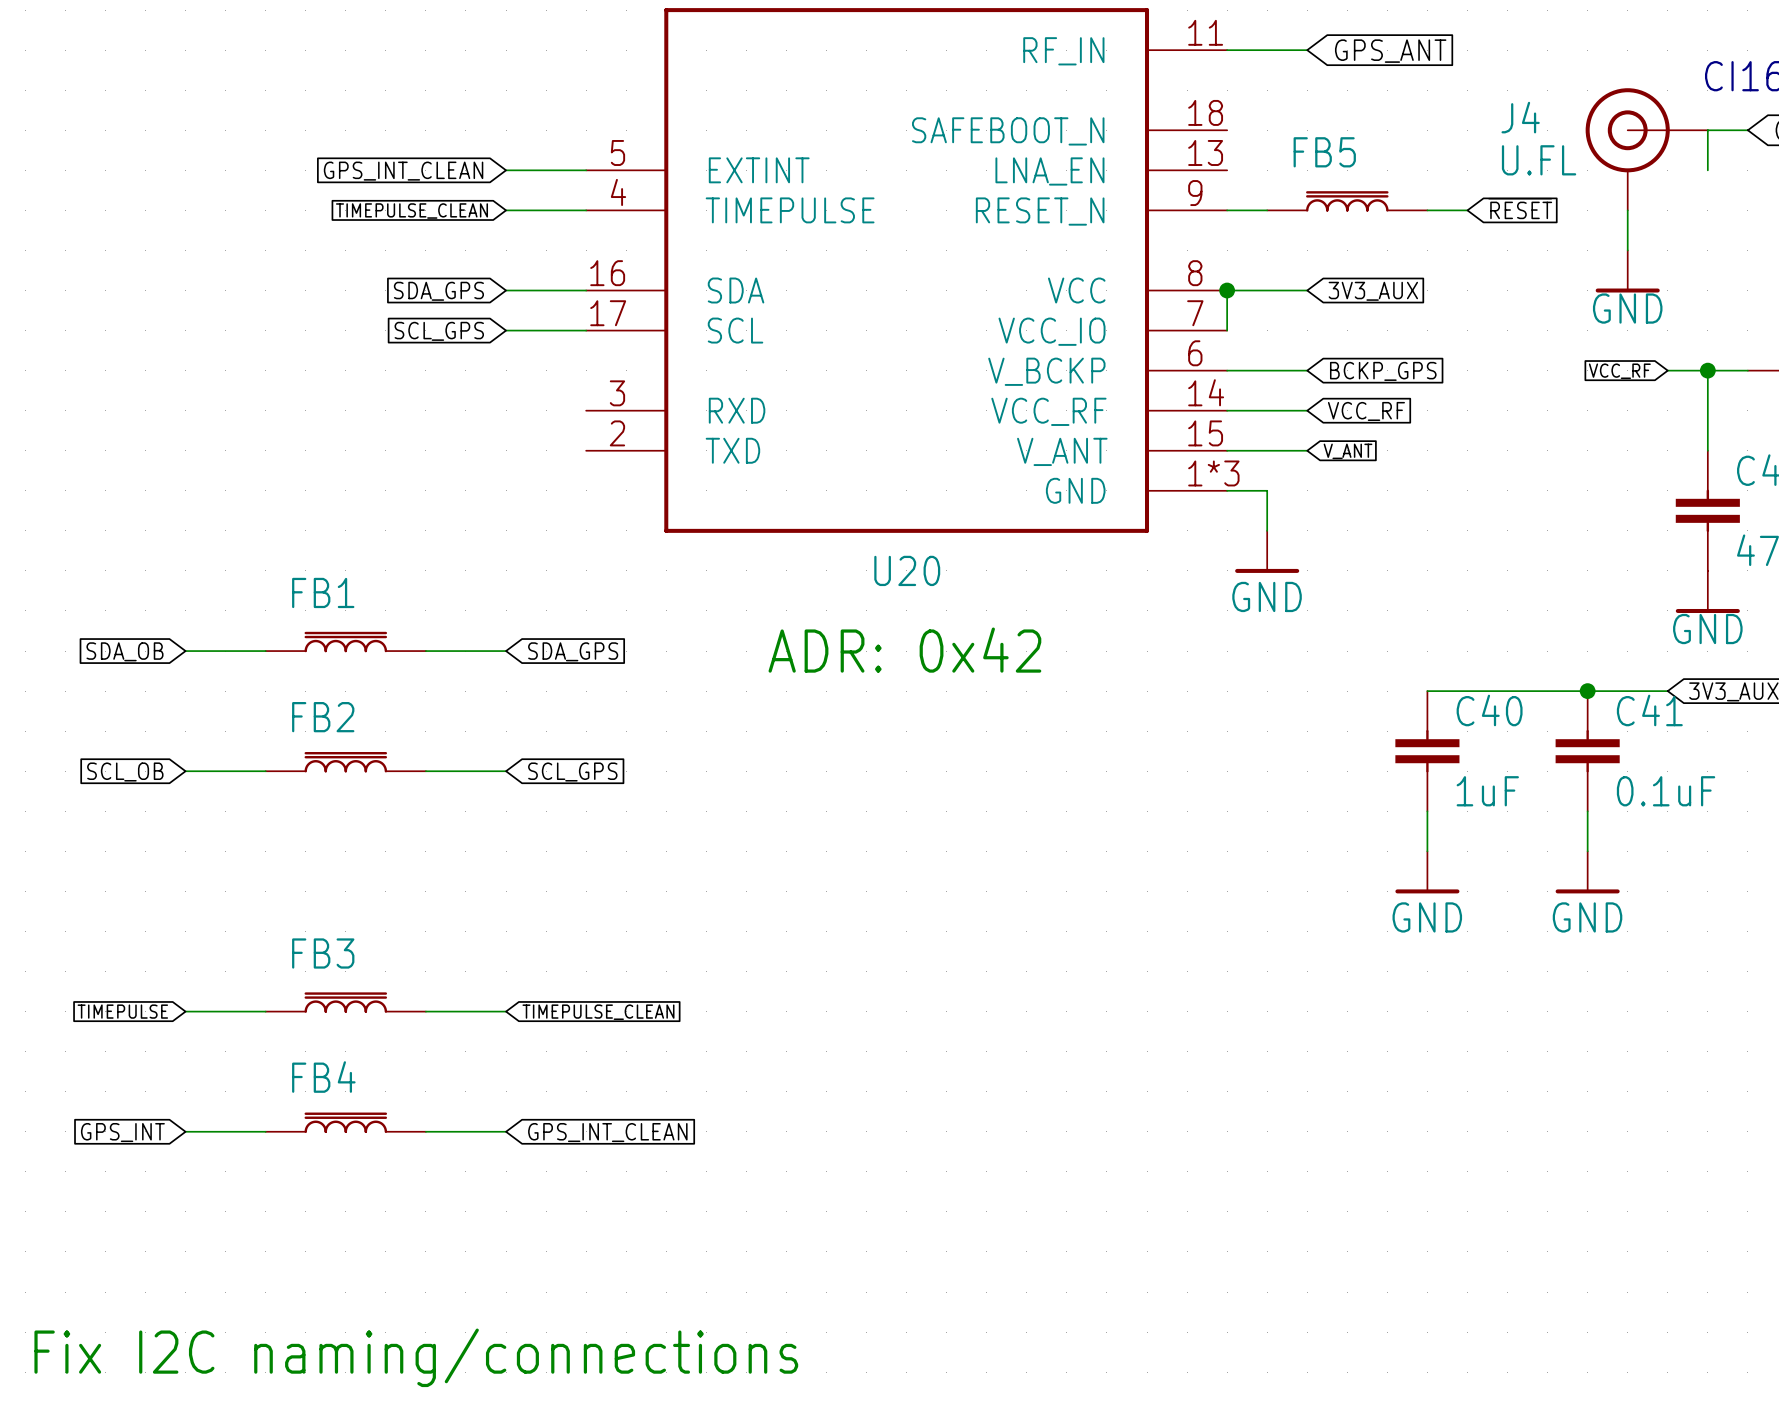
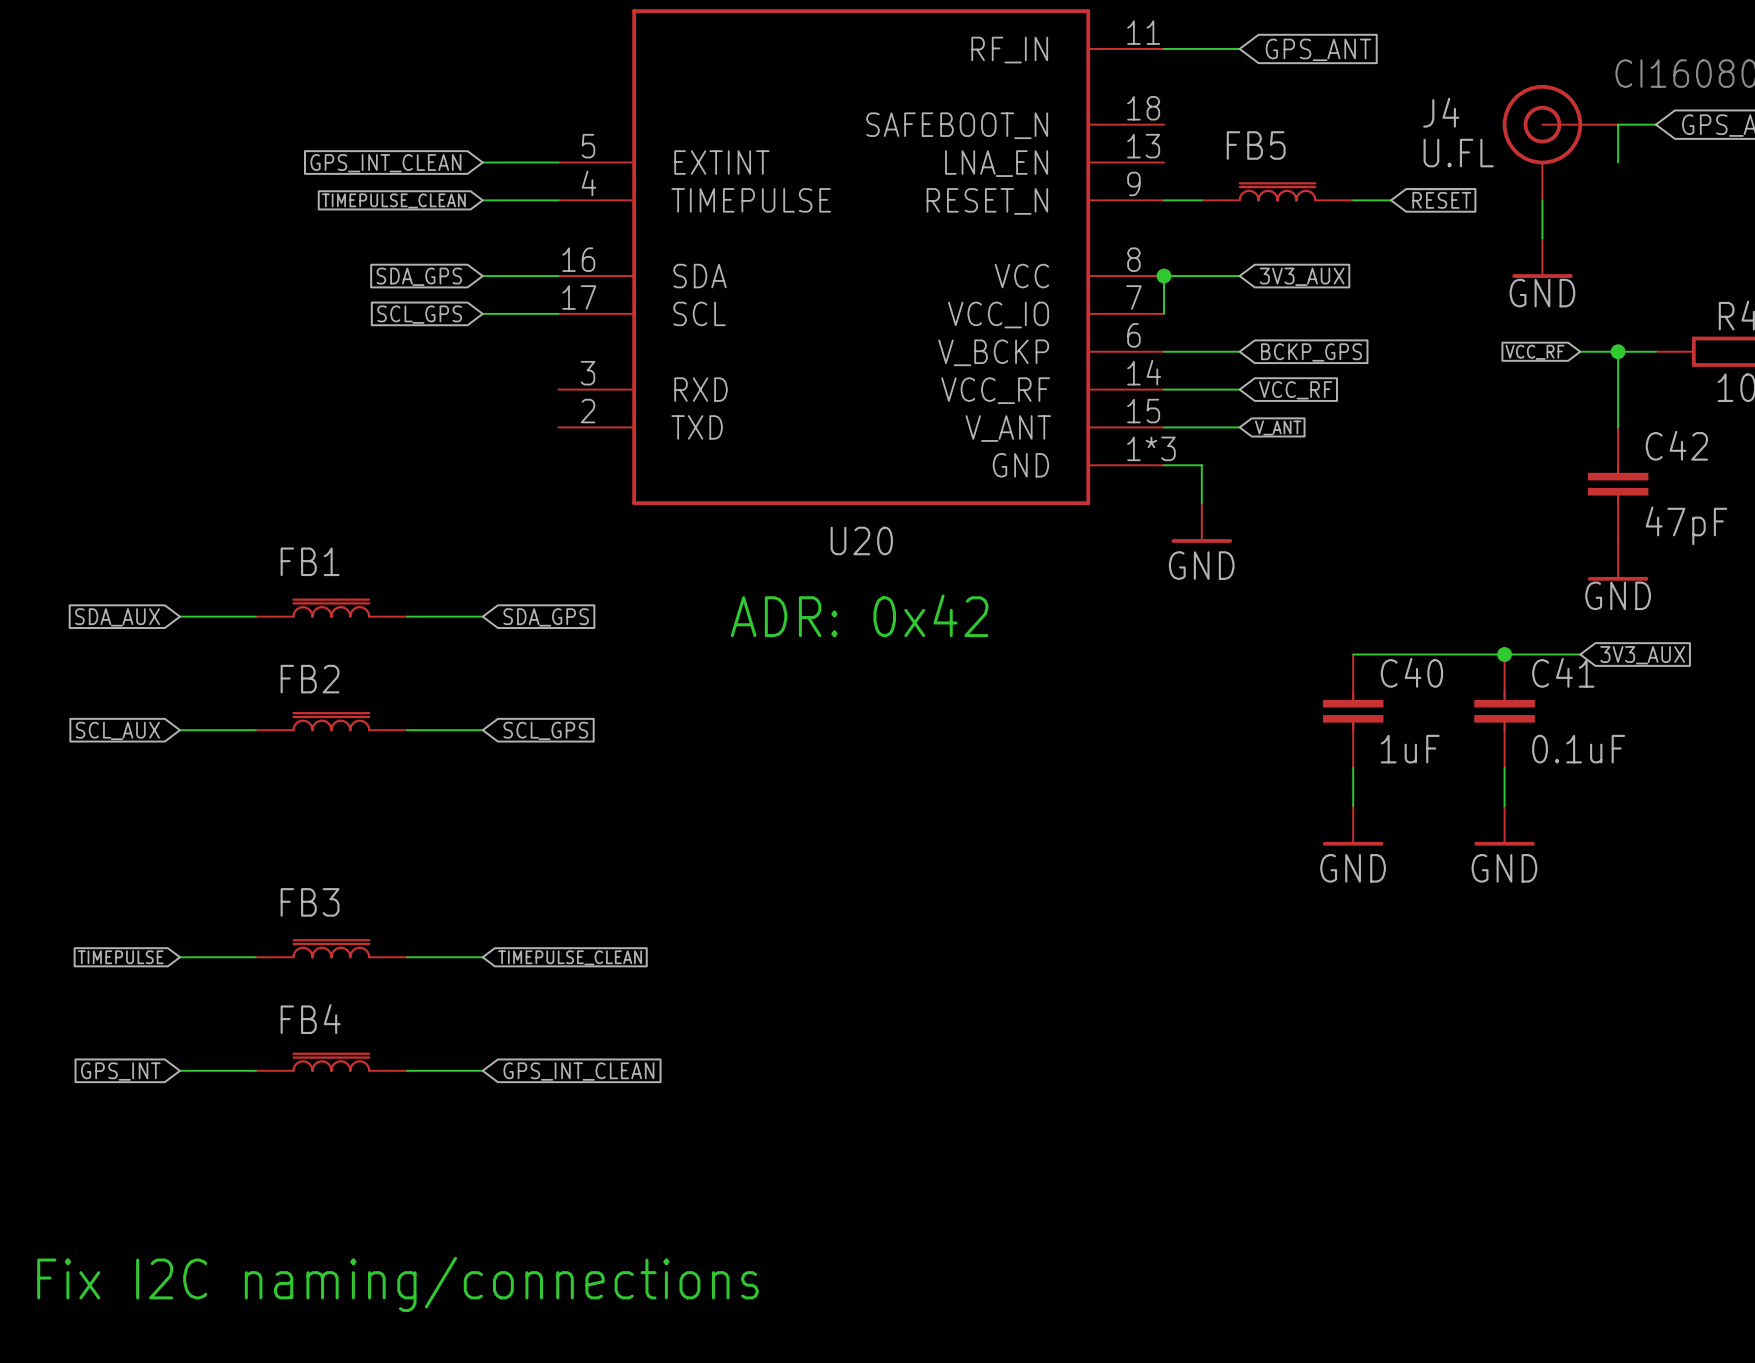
global label: SDA_OB (124, 651) -> SDA_AUX (117, 617)
global label: SCL_OB (125, 771) -> SCL_AUX (117, 730)

